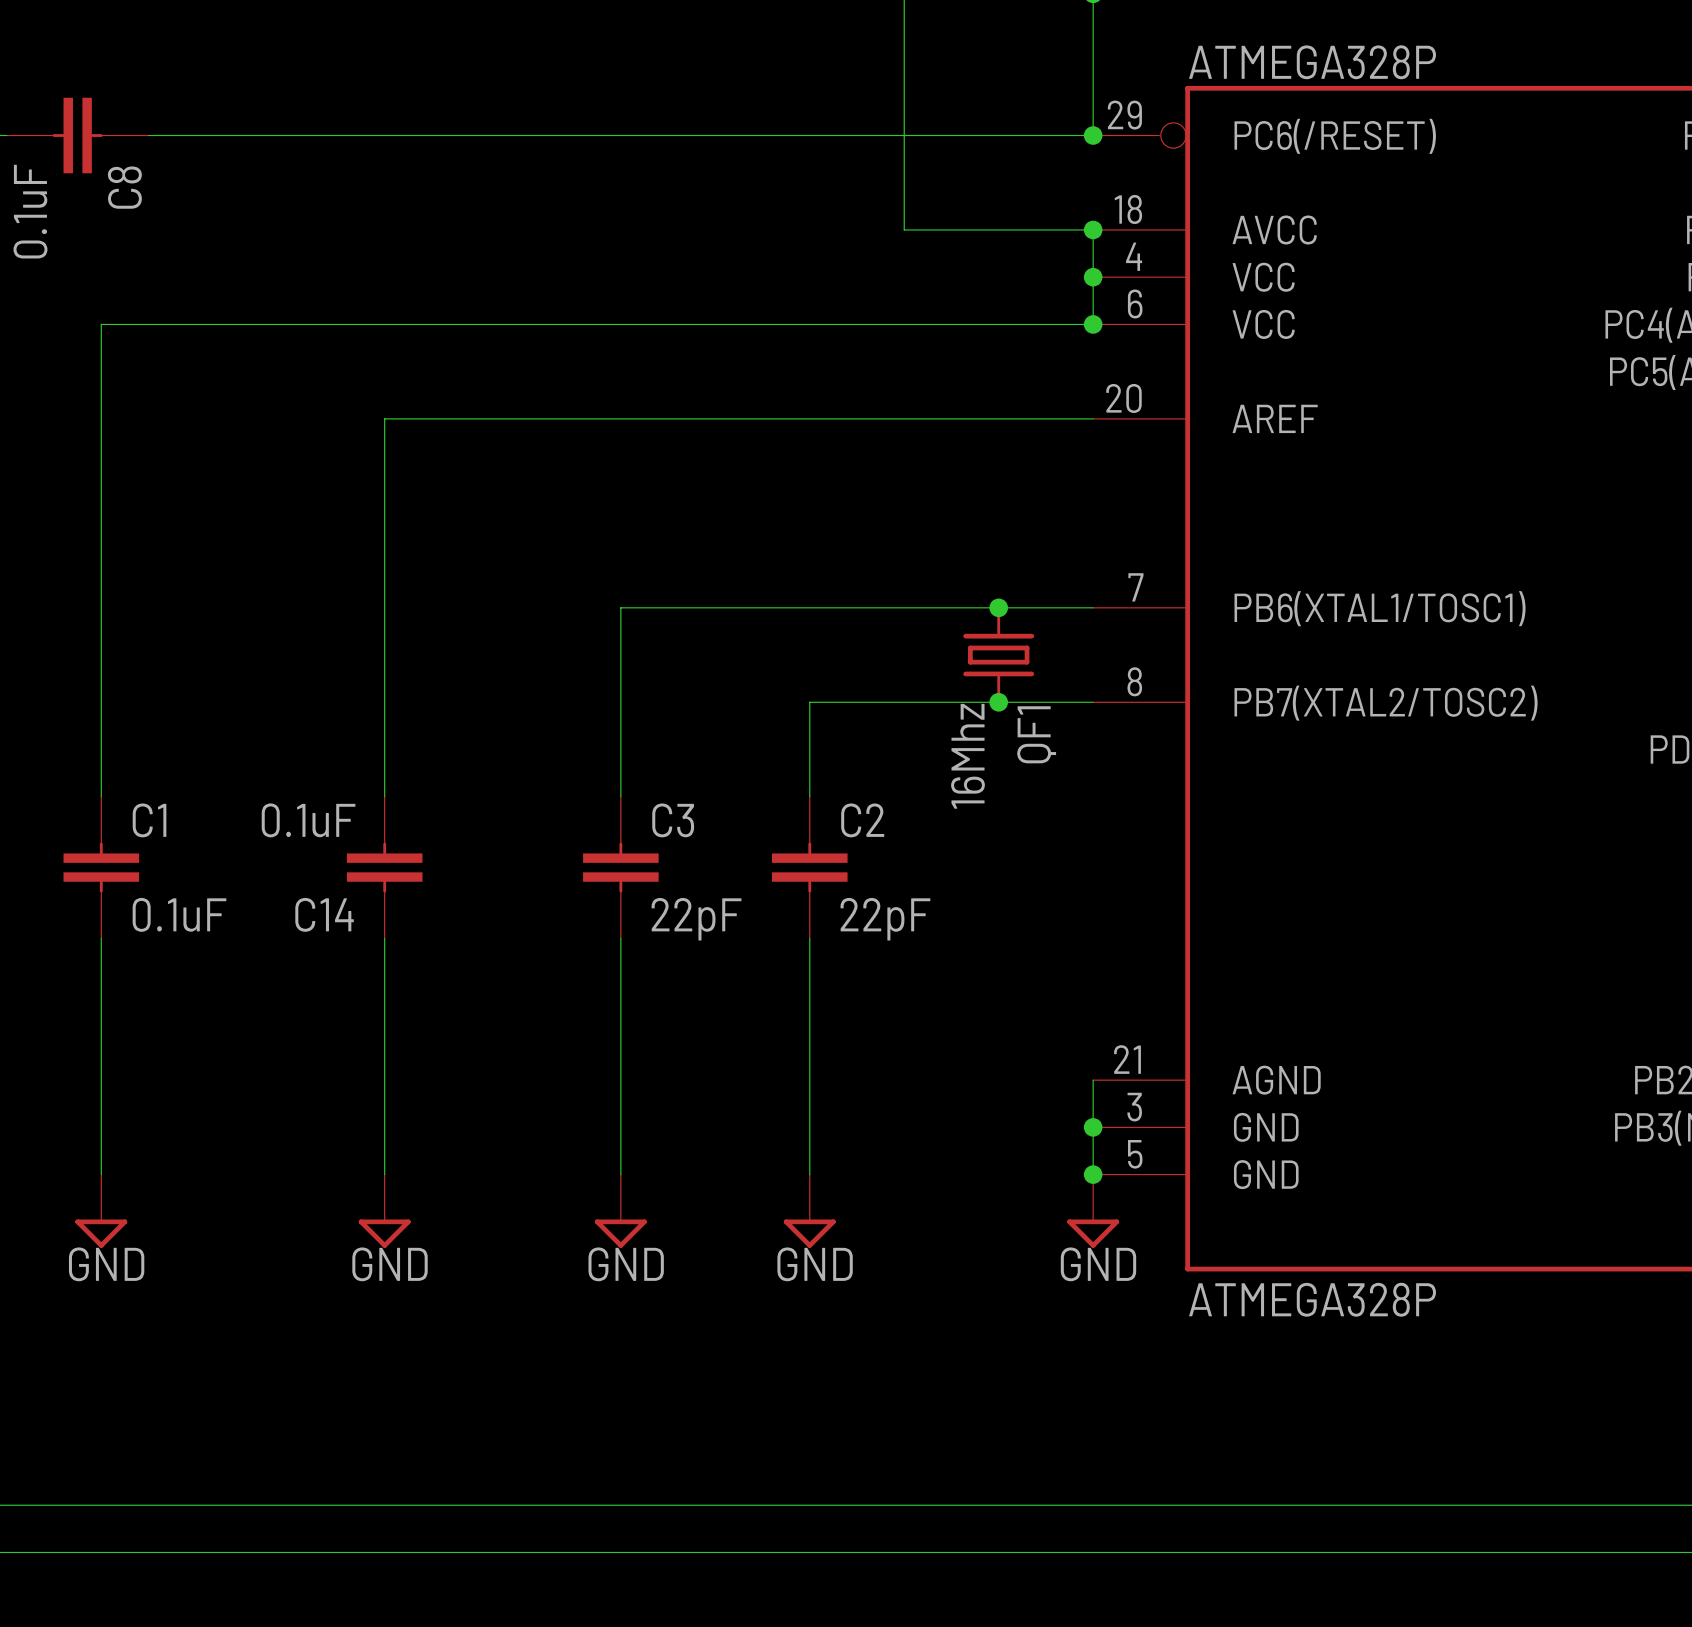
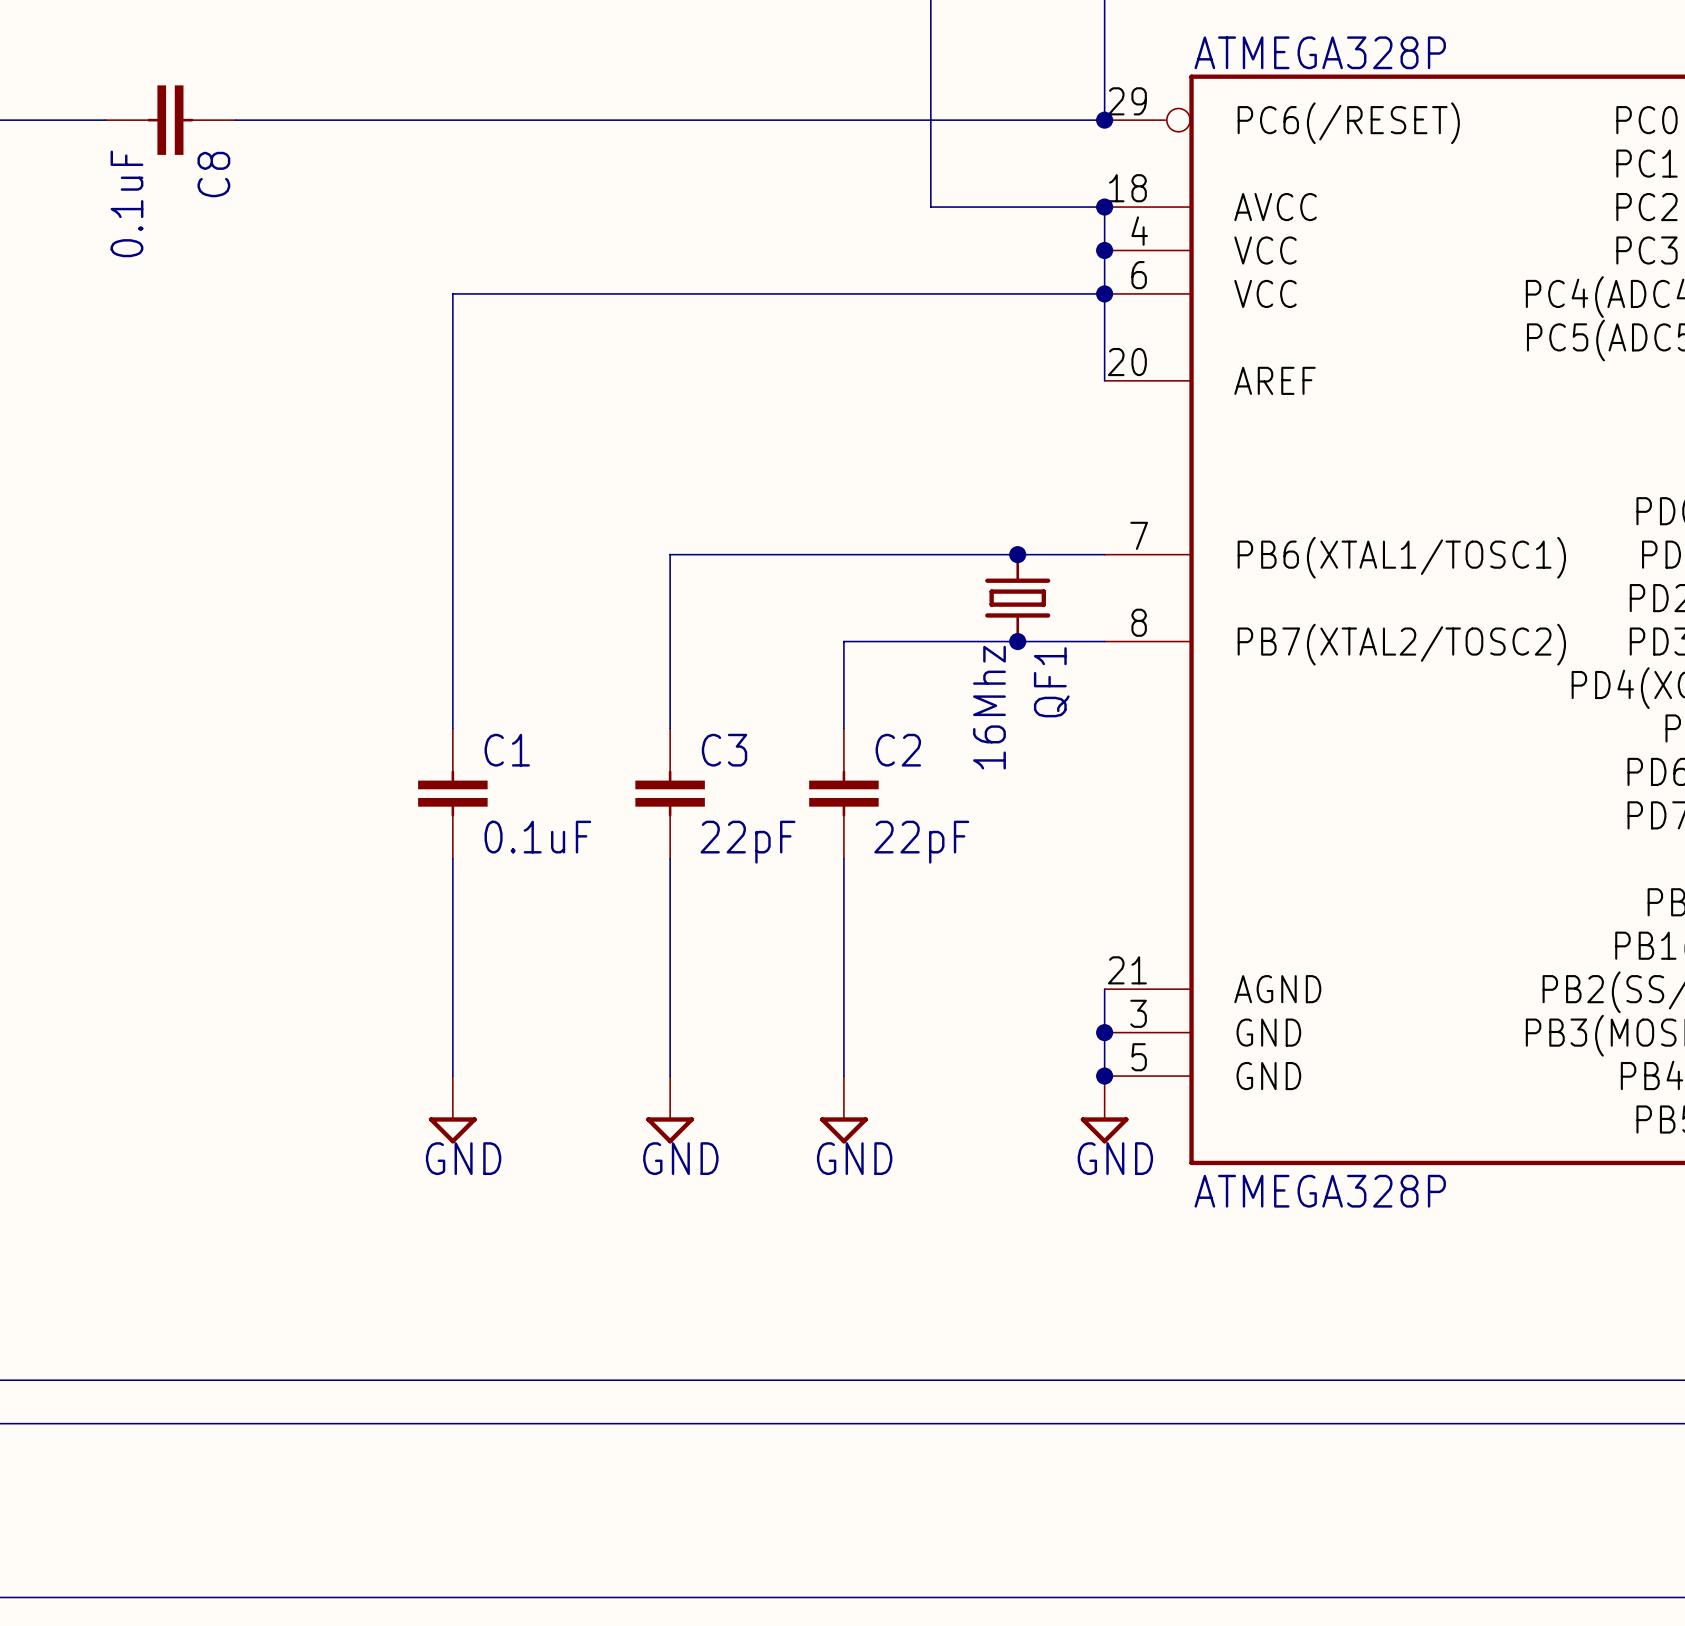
wire: (384, 324) (101, 324) (101, 796) -> (452, 293) (452, 380)
wire: (384, 418) (1093, 418) -> (1104, 293) (1104, 380)
C14 value position: 0.1uF (308, 820) -> 0.1uF (537, 837)
C1: 0.1uF (101, 867) -> none
C14 name: C14 (324, 914) -> C1 (507, 750)
wire: (101, 938) (101, 1174) -> none
power symbol: GND (101, 1211) -> none

